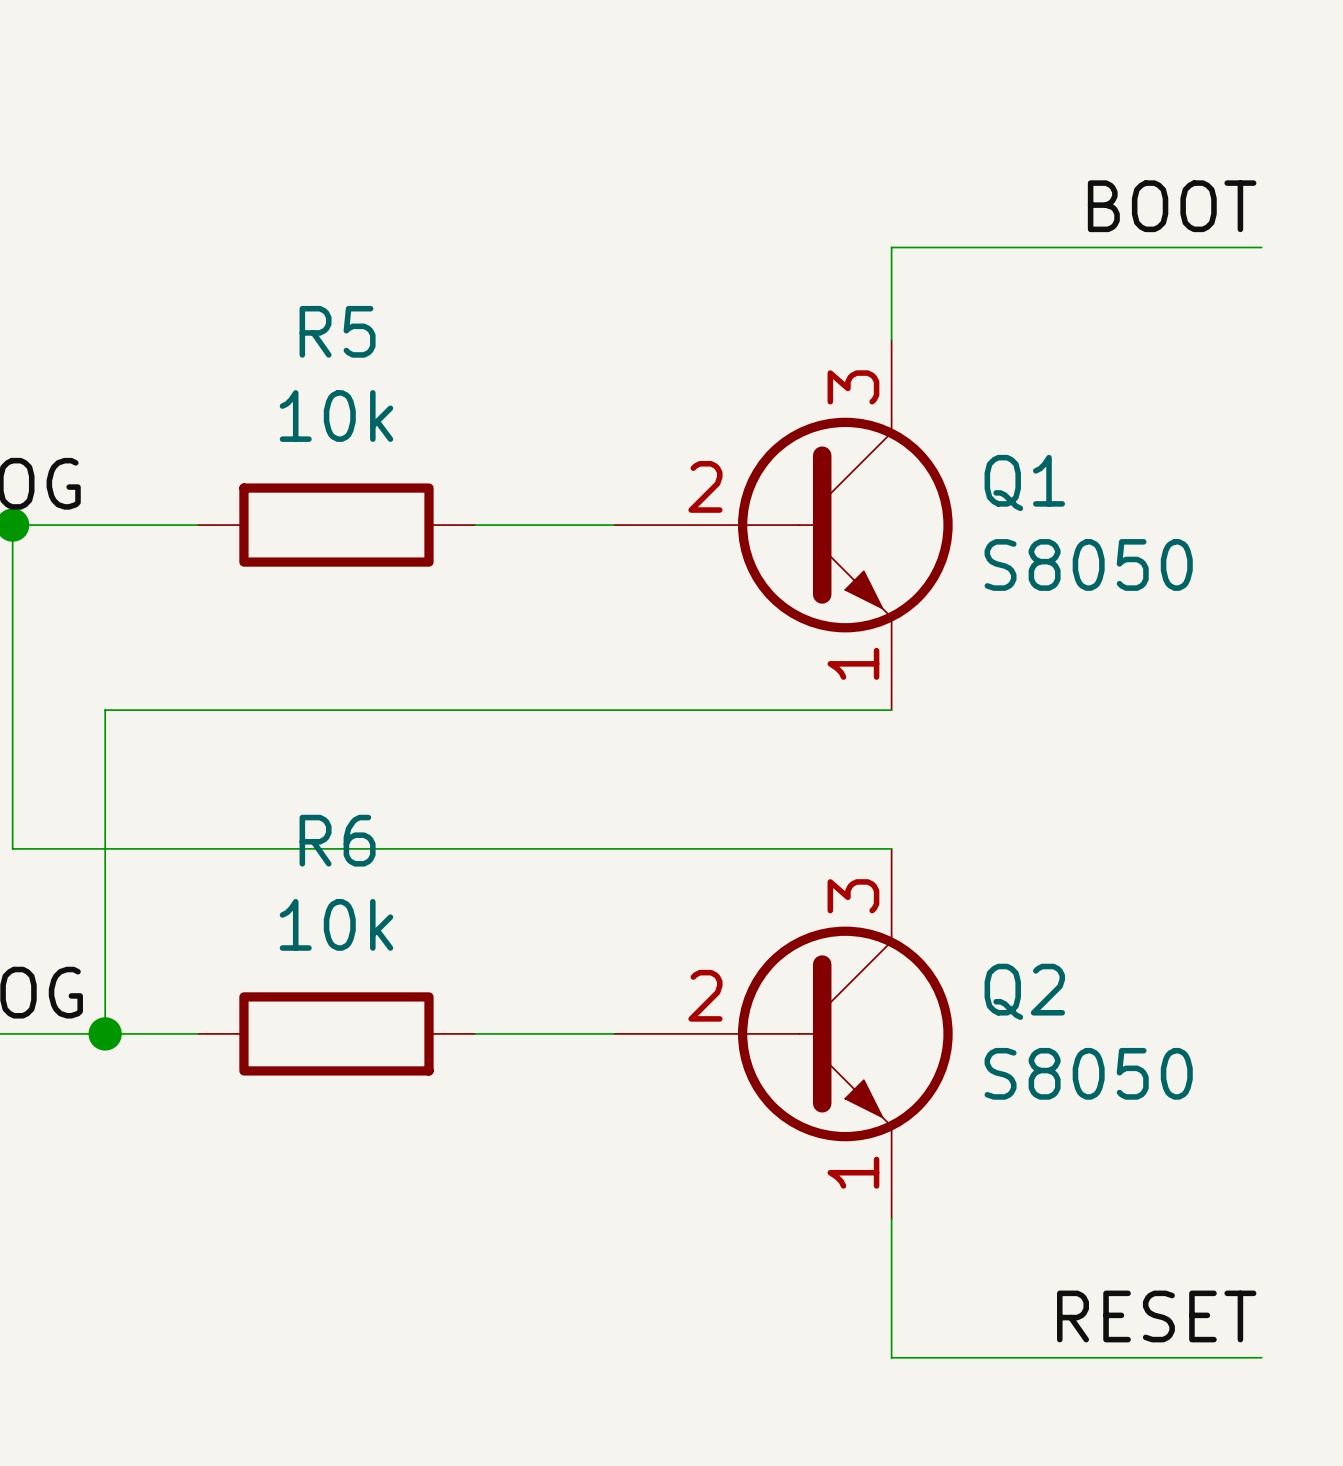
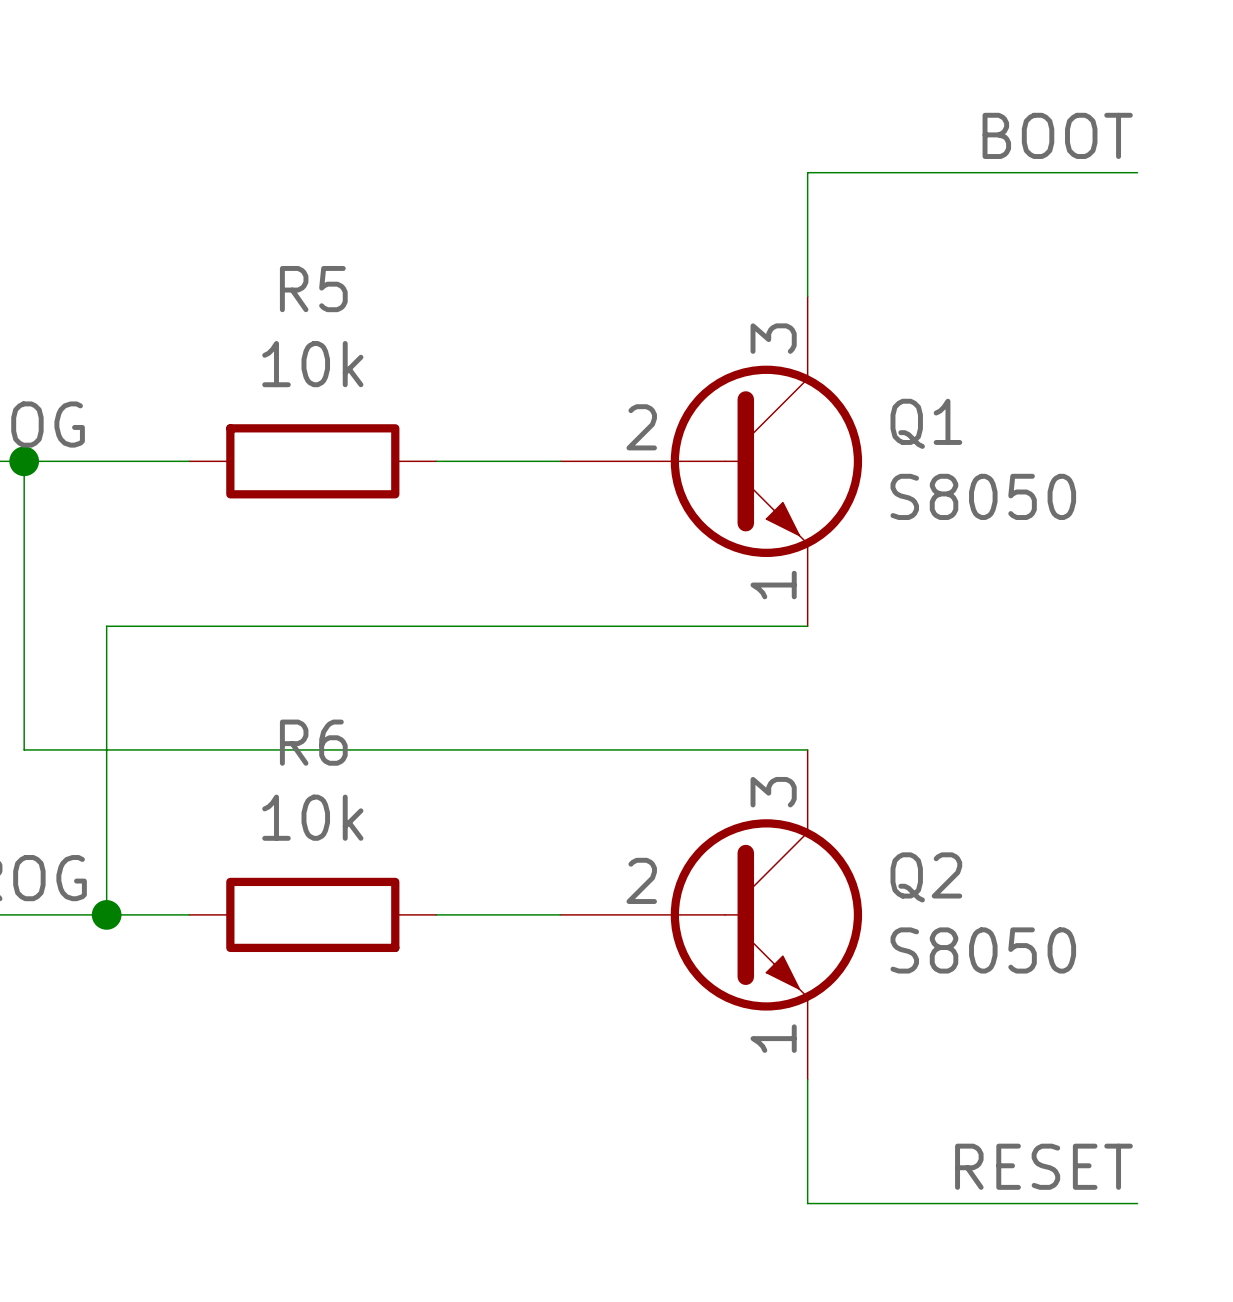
label position: BOOT (1172, 206) -> BOOT (1057, 135)
wire: (891, 247) (1261, 247) -> (807, 213) (807, 172) (1137, 172)

